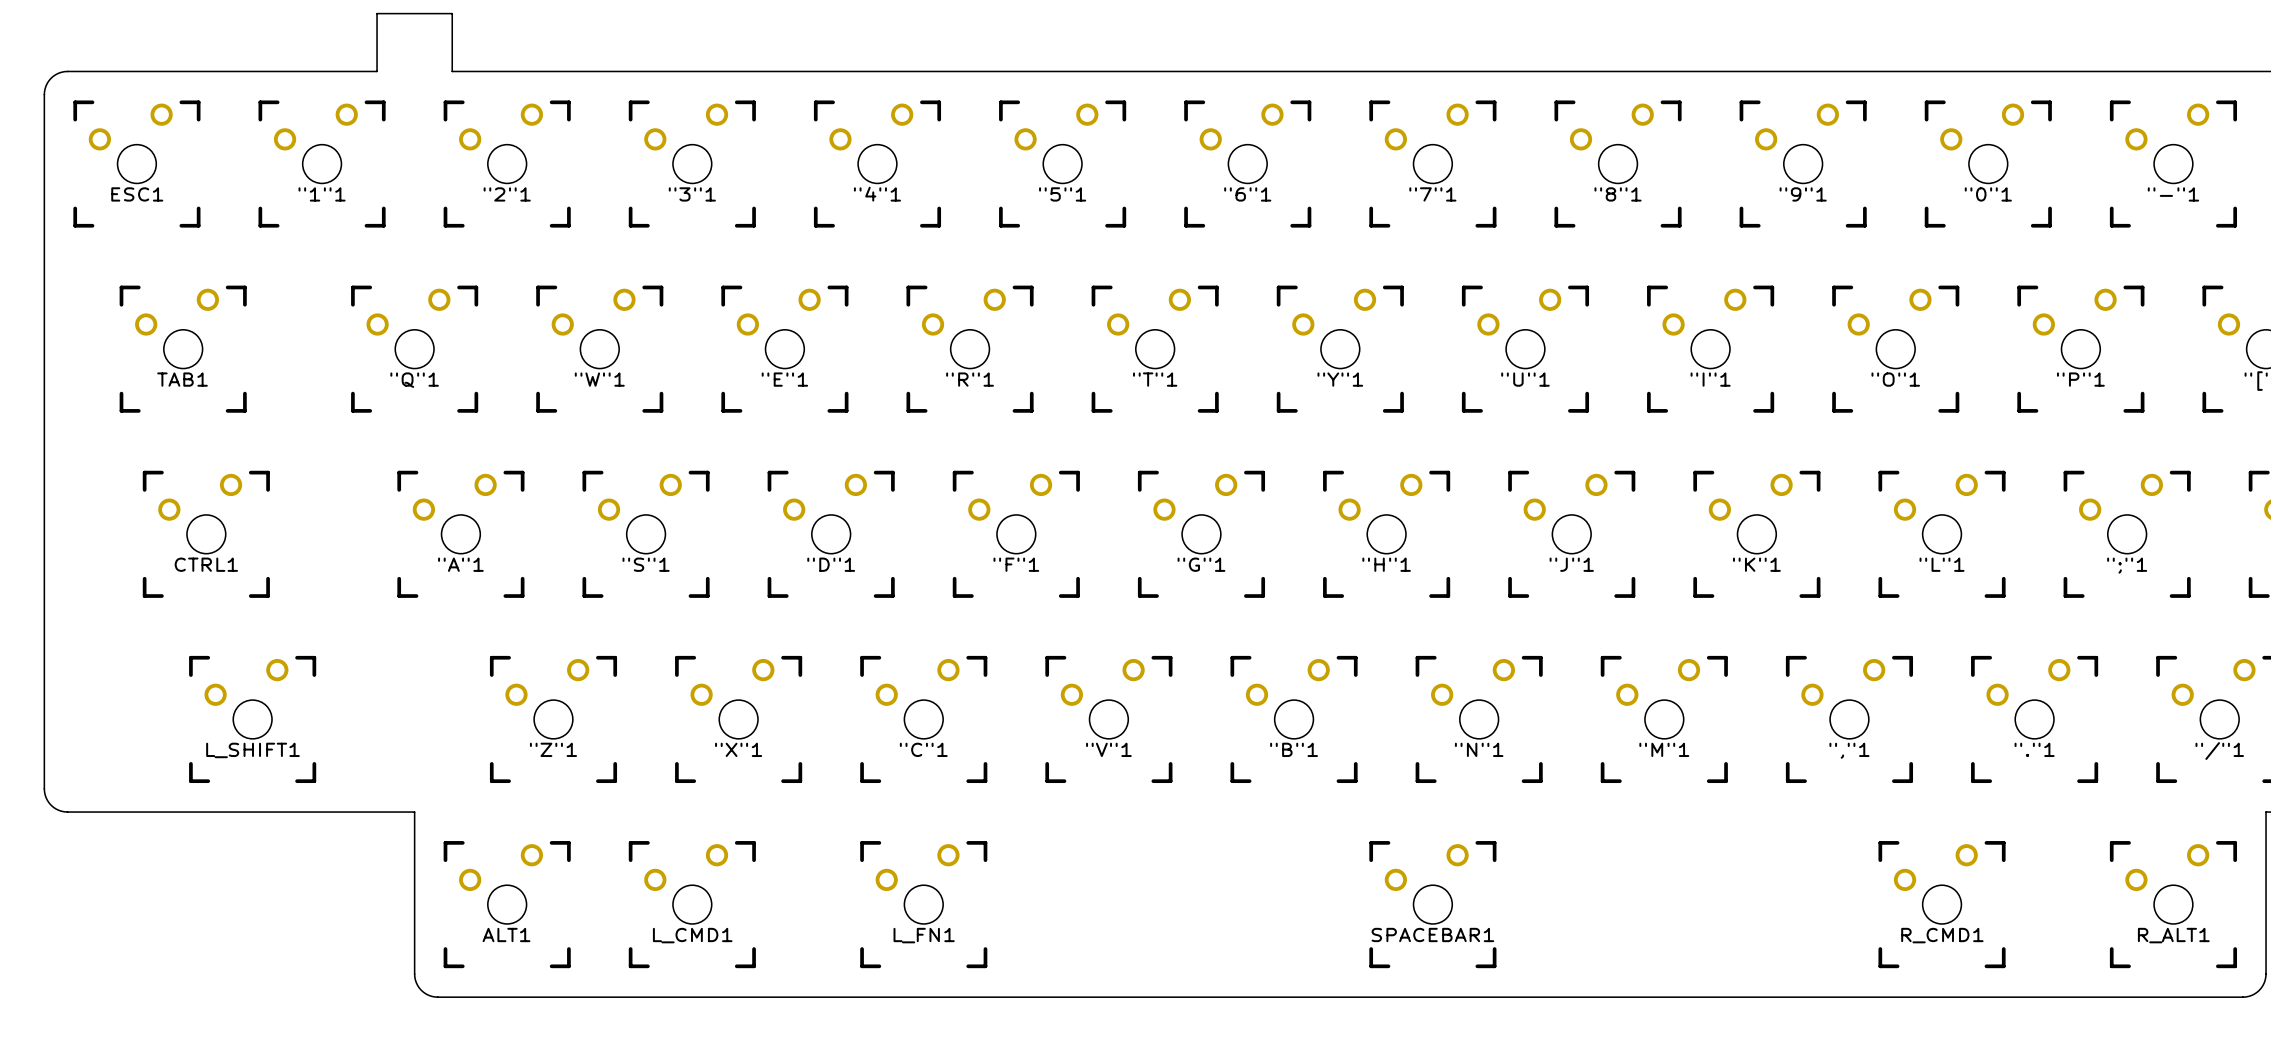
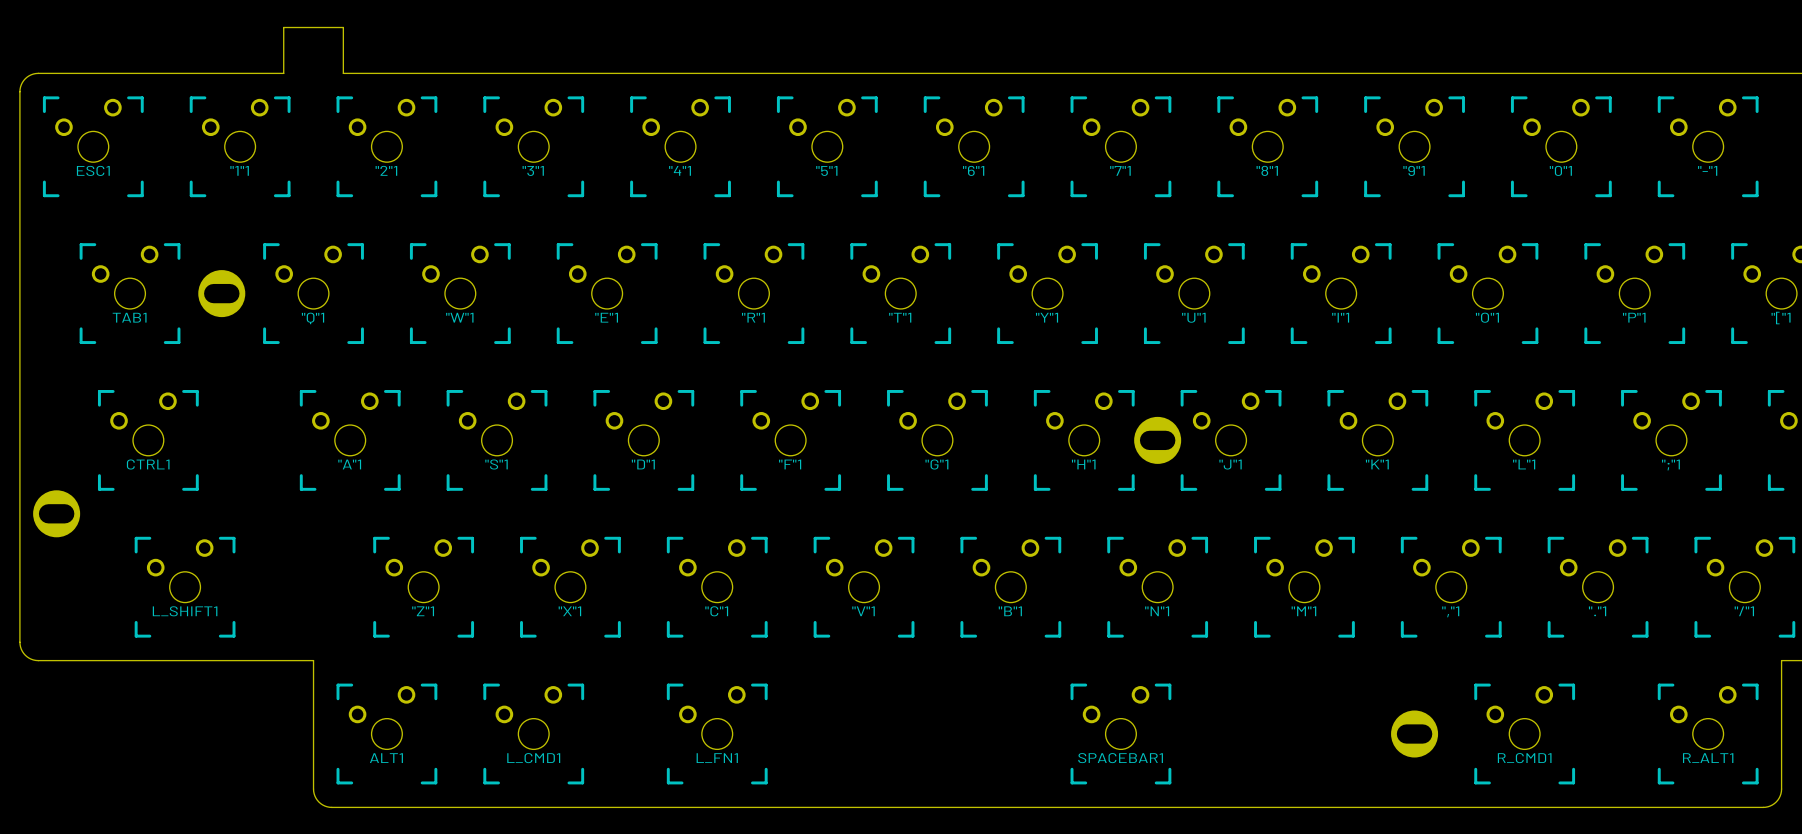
part: none -> (221, 293)
part: none -> (1157, 440)
part: none -> (56, 513)
part: none -> (1414, 734)

